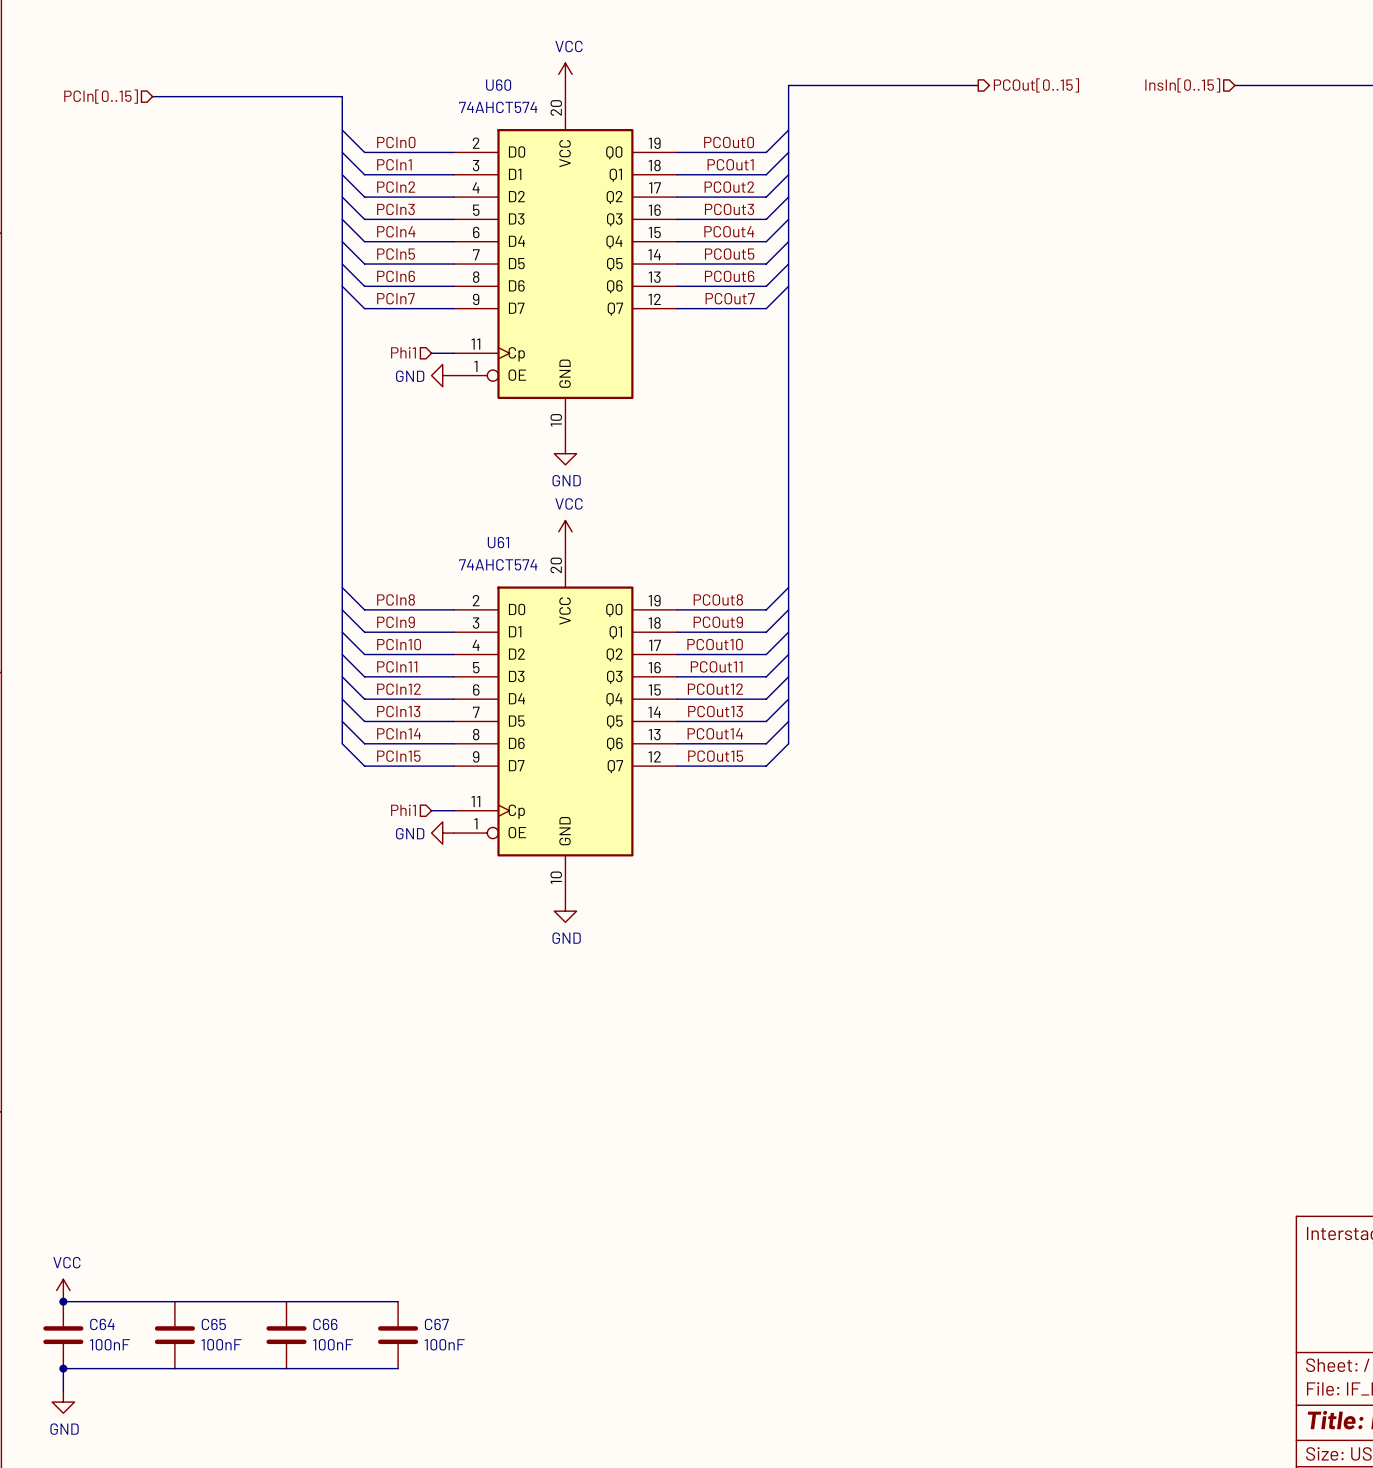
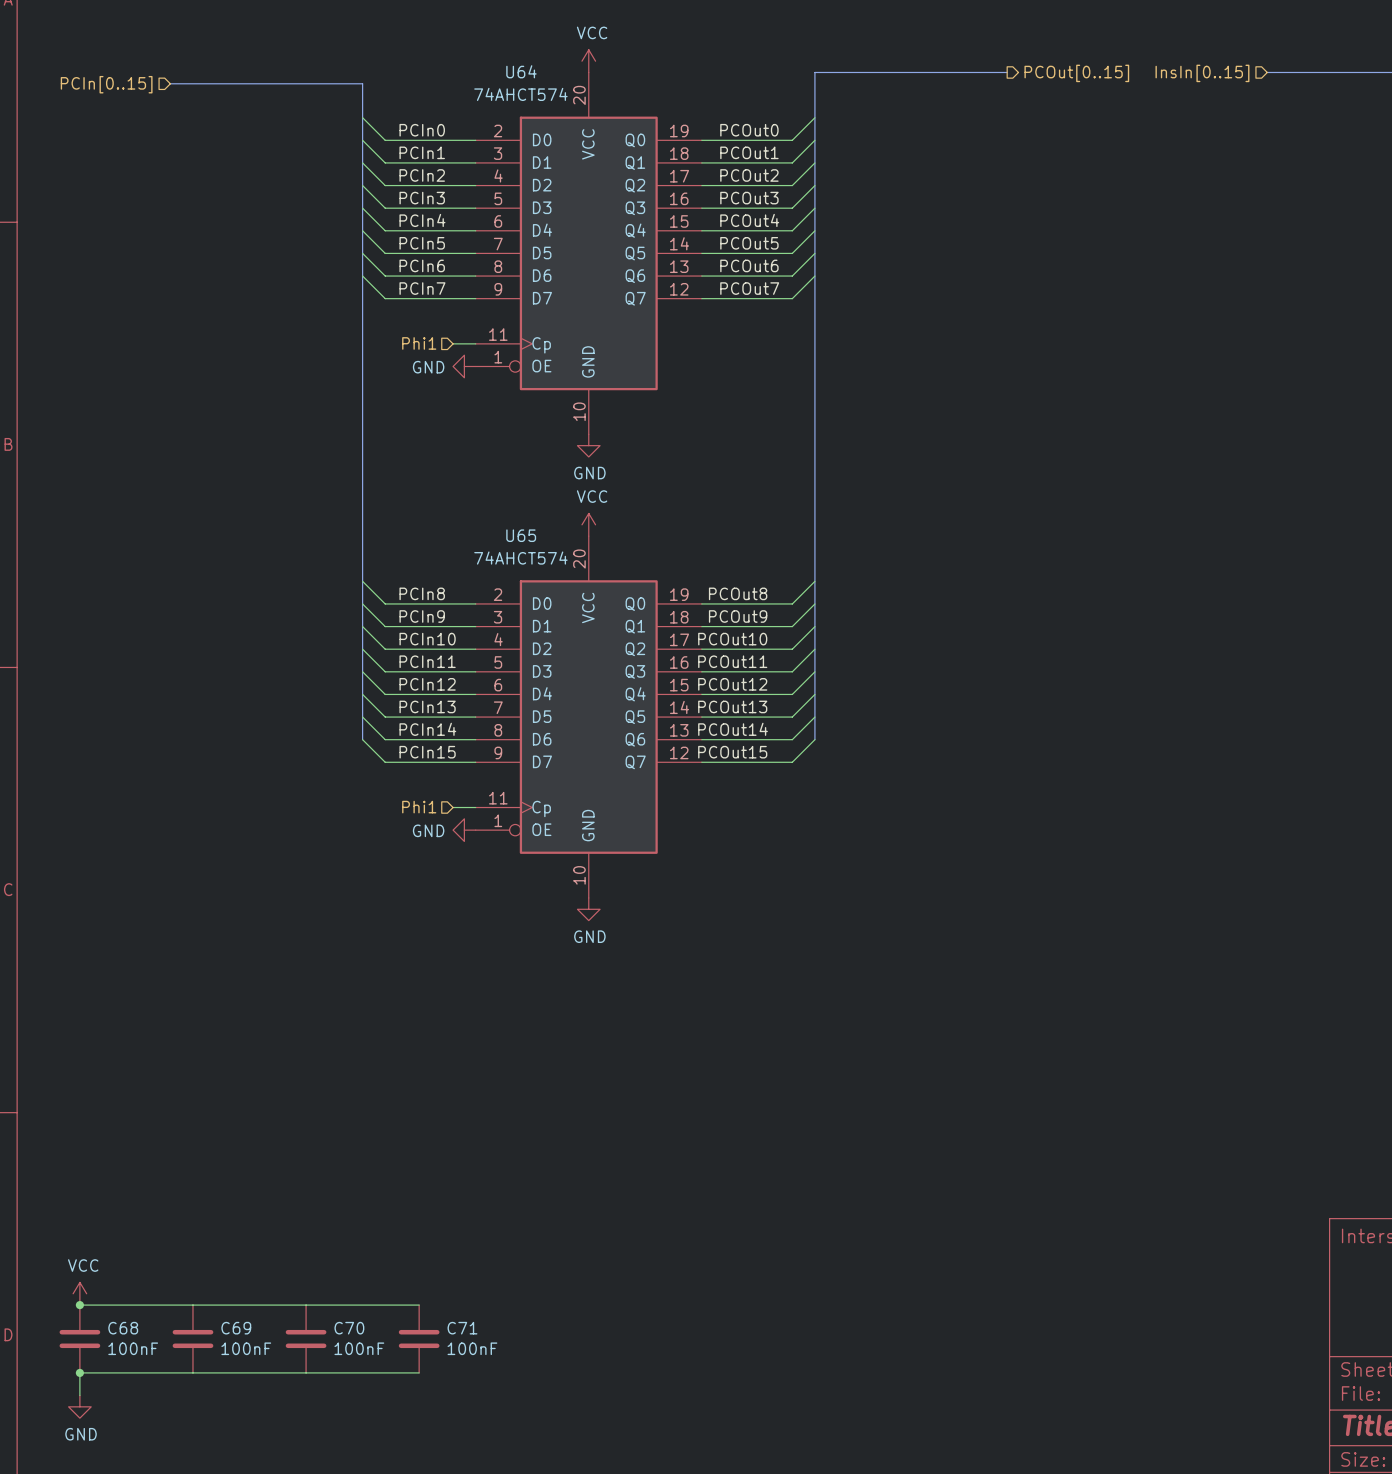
U60 name: U60 (498, 85) -> U64 (521, 71)
U61 name: U61 (498, 542) -> U65 (521, 535)
C64 name: C64 (102, 1324) -> C68 (123, 1328)
C65 name: C65 (213, 1324) -> C69 (236, 1328)
C66 name: C66 (325, 1324) -> C70 (349, 1328)
C67 name: C67 (436, 1324) -> C71 (462, 1328)

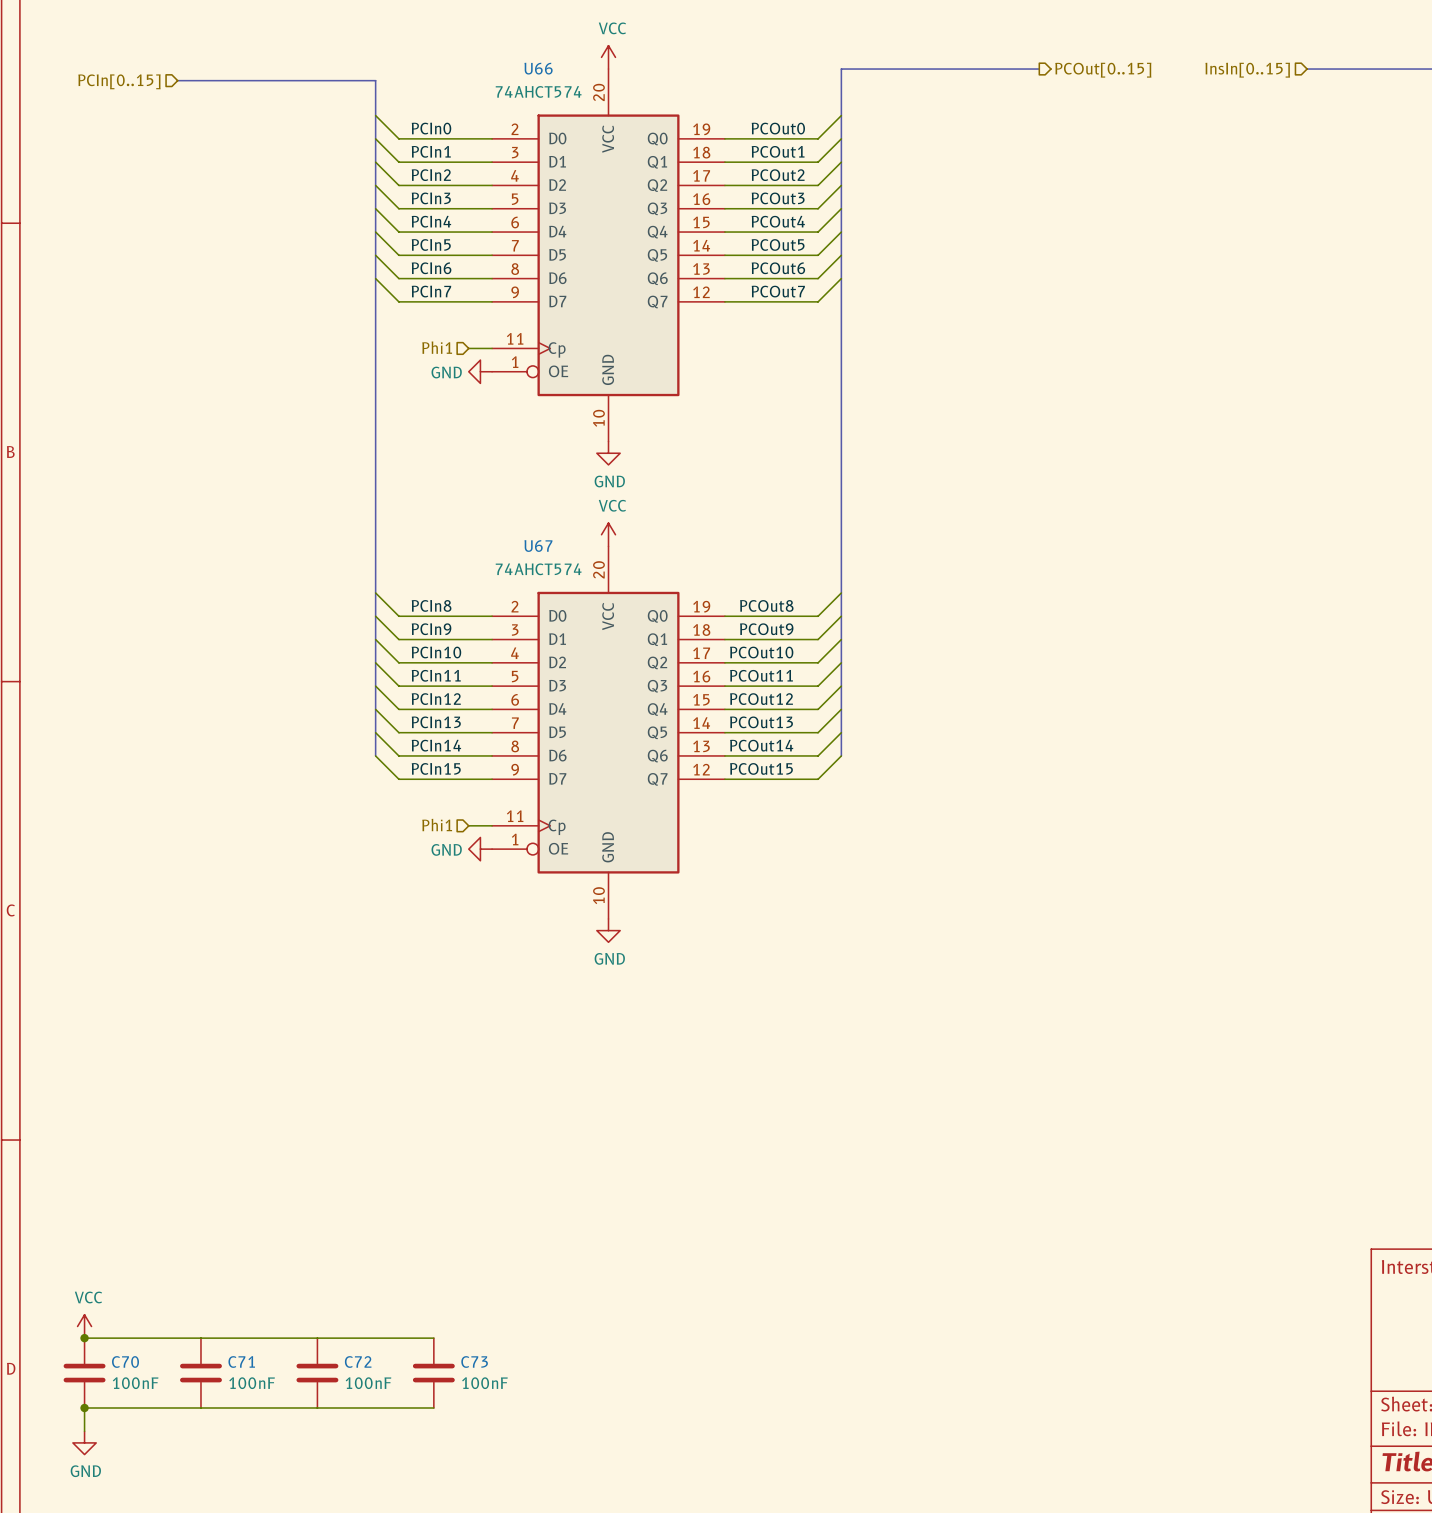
U64 name: U64 (521, 71) -> U66 (538, 68)
U65 name: U65 (521, 535) -> U67 (538, 546)
C68 name: C68 (123, 1328) -> C70 (125, 1361)
C69 name: C69 (236, 1328) -> C71 (241, 1361)
C70 name: C70 (349, 1328) -> C72 (358, 1361)
C71 name: C71 (462, 1328) -> C73 (474, 1361)

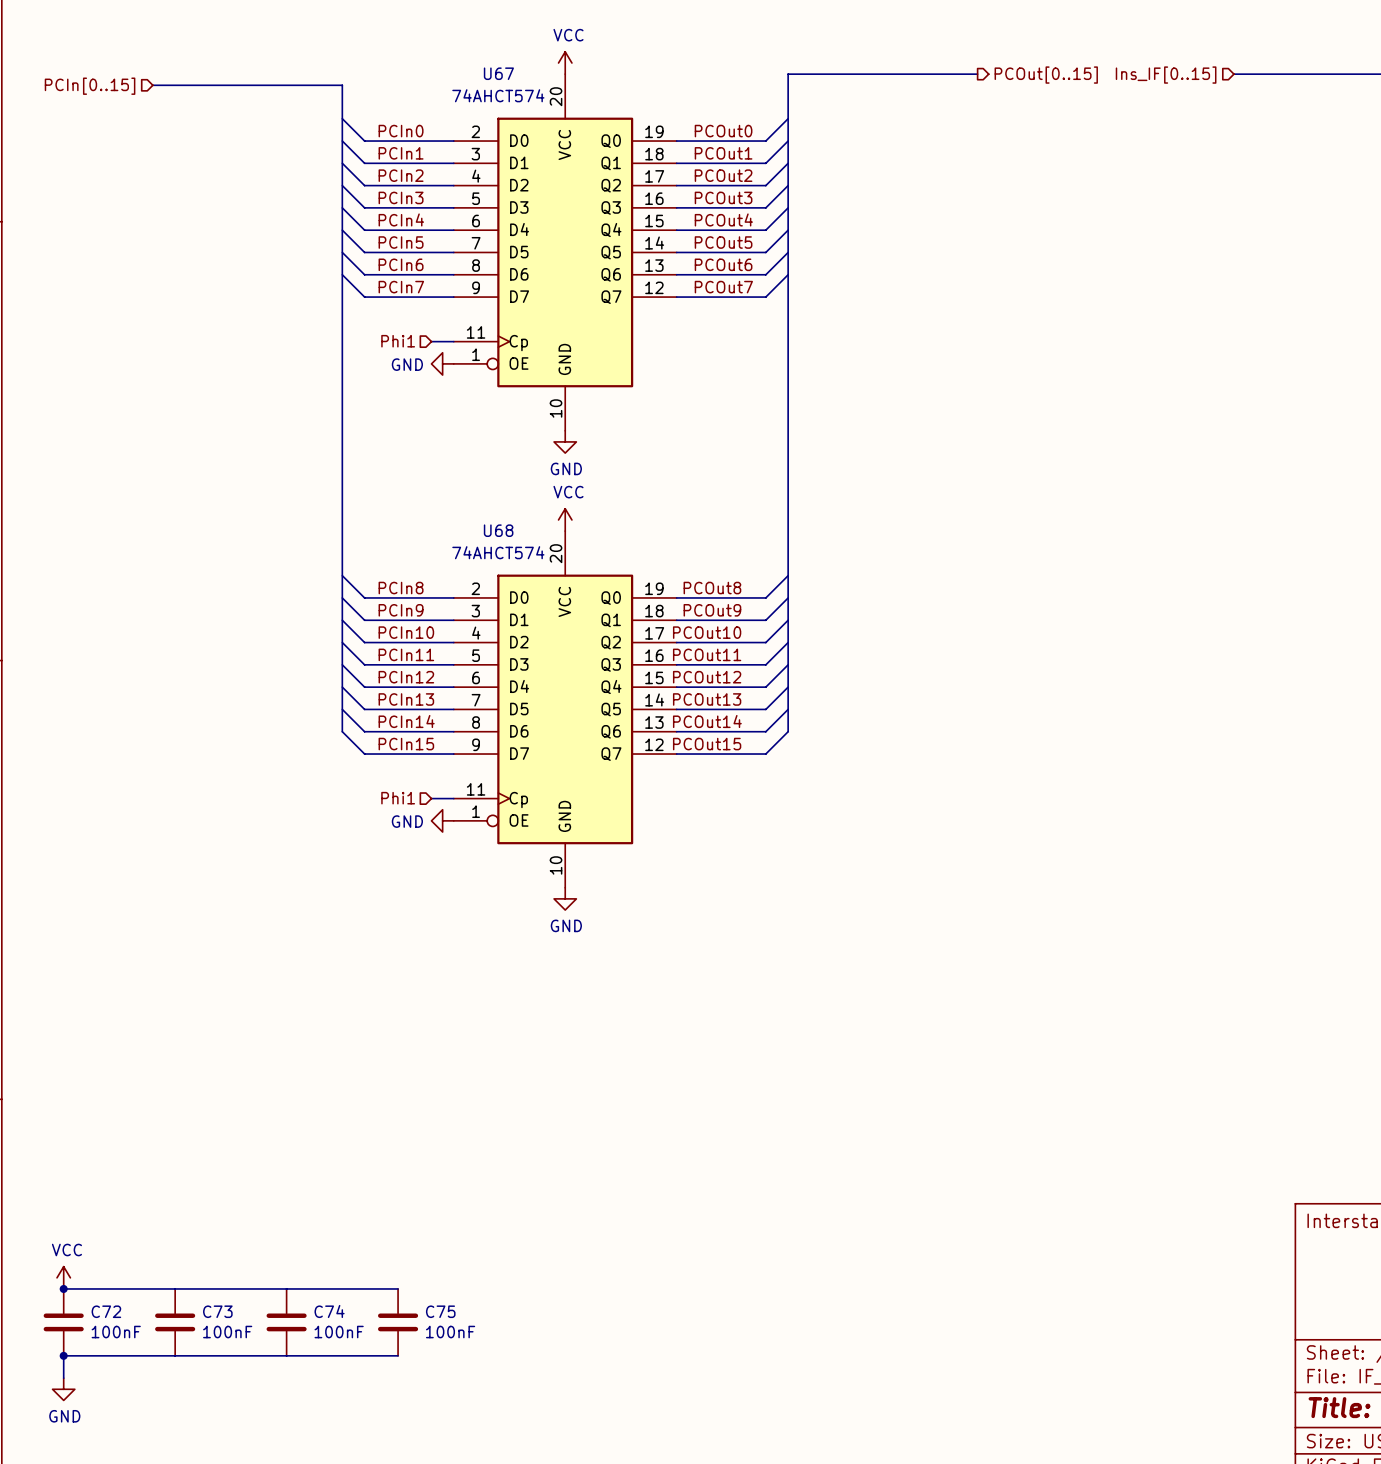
U66 name: U66 (538, 68) -> U67 (498, 73)
hierarchical label: InsIn[0..15] (1247, 70) -> Ins_IF[0..15] (1166, 75)
U67 name: U67 (538, 546) -> U68 (498, 530)
C70 name: C70 (125, 1361) -> C72 (106, 1311)
C71 name: C71 (241, 1361) -> C73 (217, 1311)
C72 name: C72 (358, 1361) -> C74 (329, 1311)
C73 name: C73 (474, 1361) -> C75 (440, 1311)

